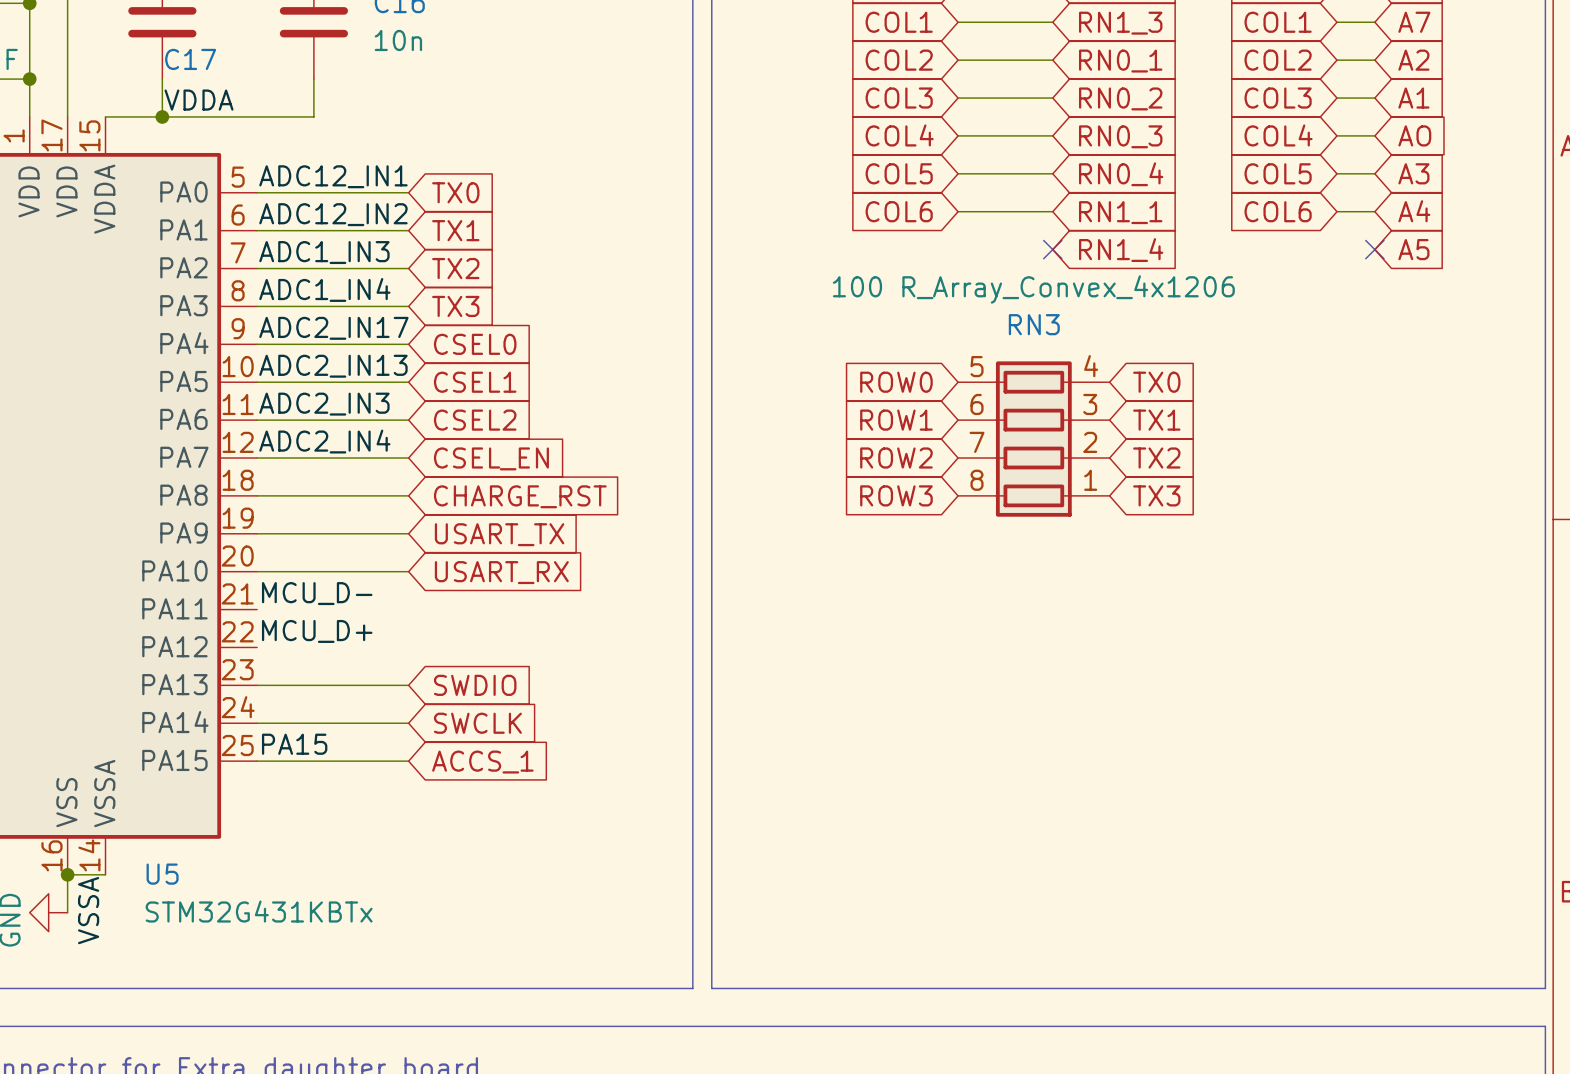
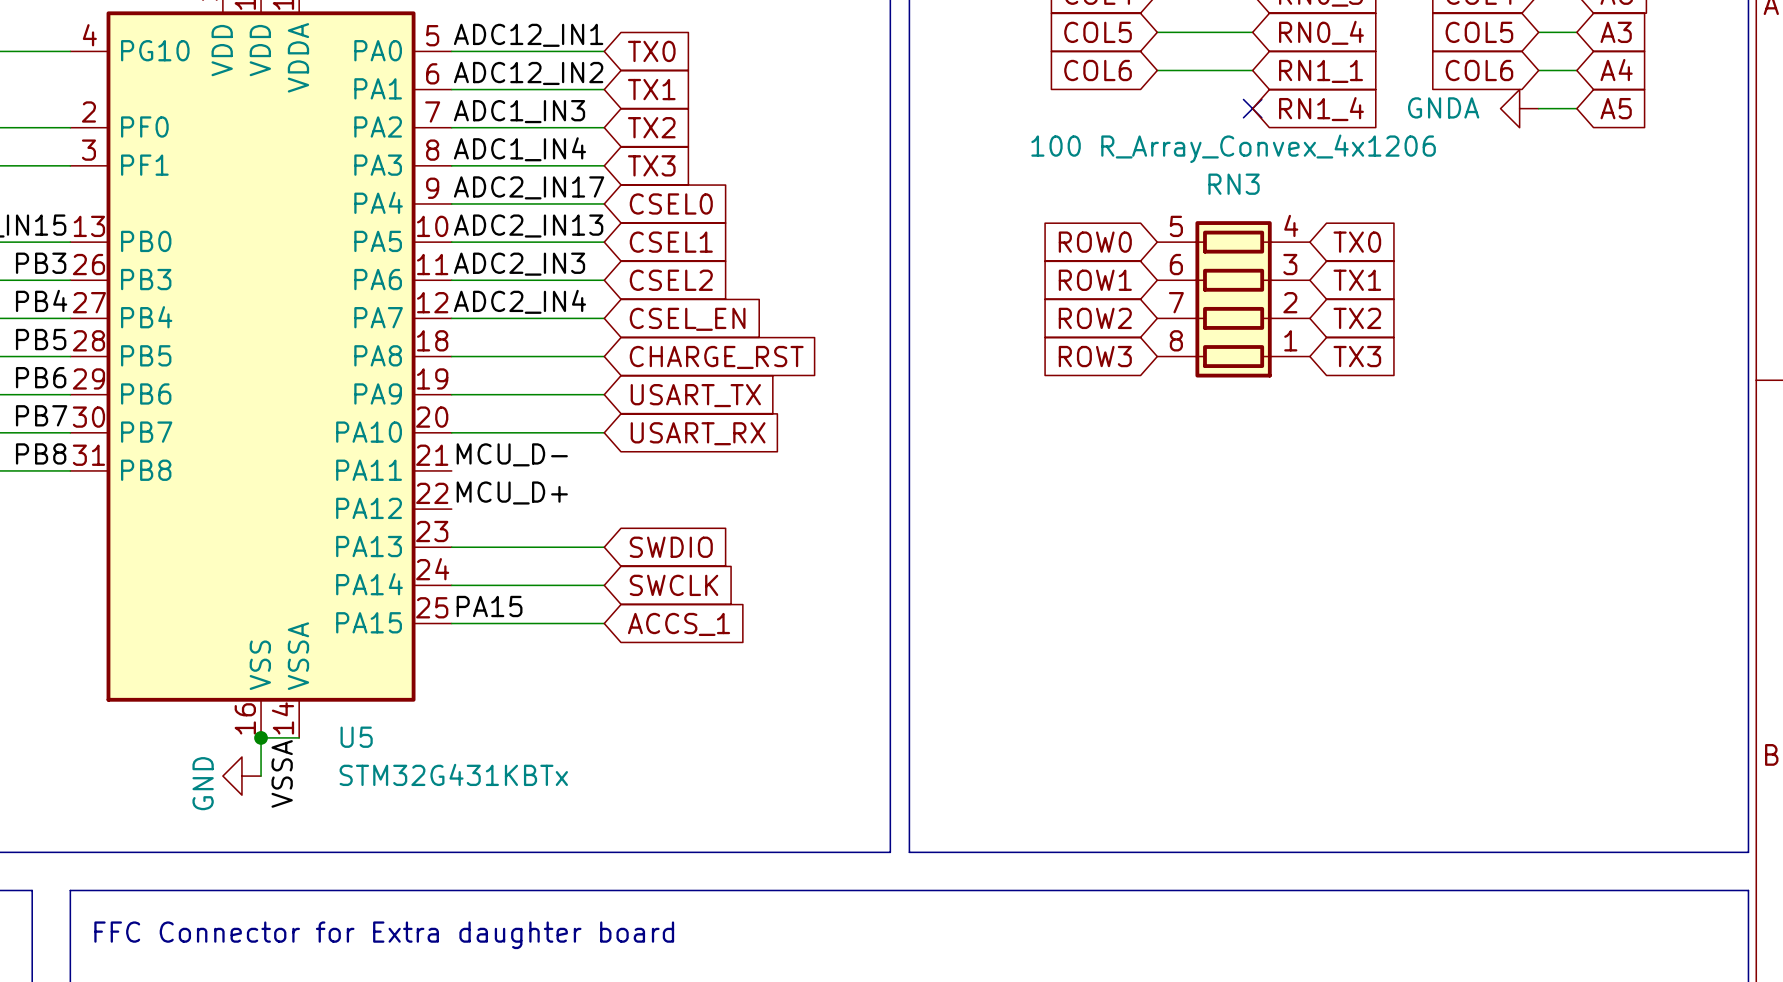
power symbol: none -> GNDA (1519, 108)
wire: none -> (1538, 108) (1576, 108)
no-connect mark: (1374, 249) -> none

